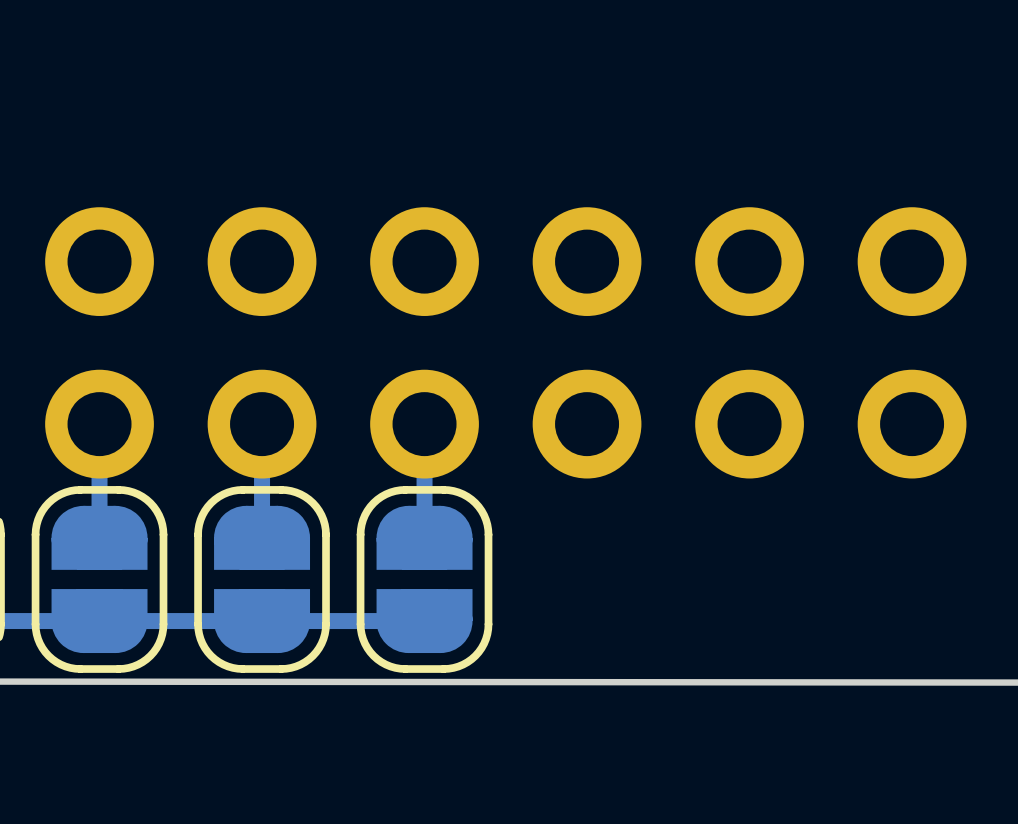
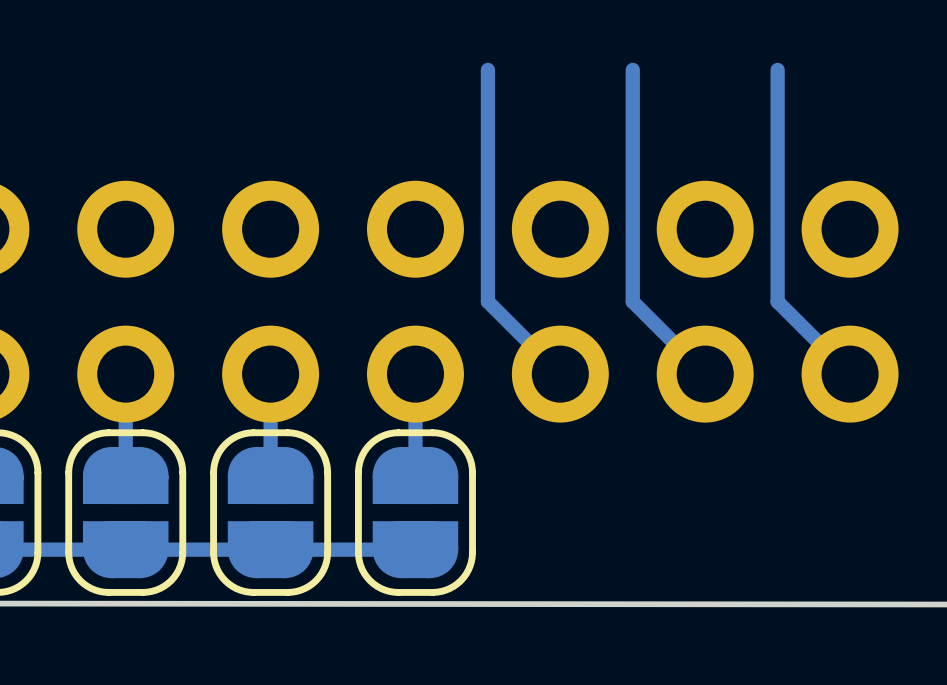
track: none -> (487, 69) (487, 301) (560, 374)
track: none -> (632, 69) (632, 301) (705, 374)
track: none -> (777, 69) (777, 301) (850, 374)

